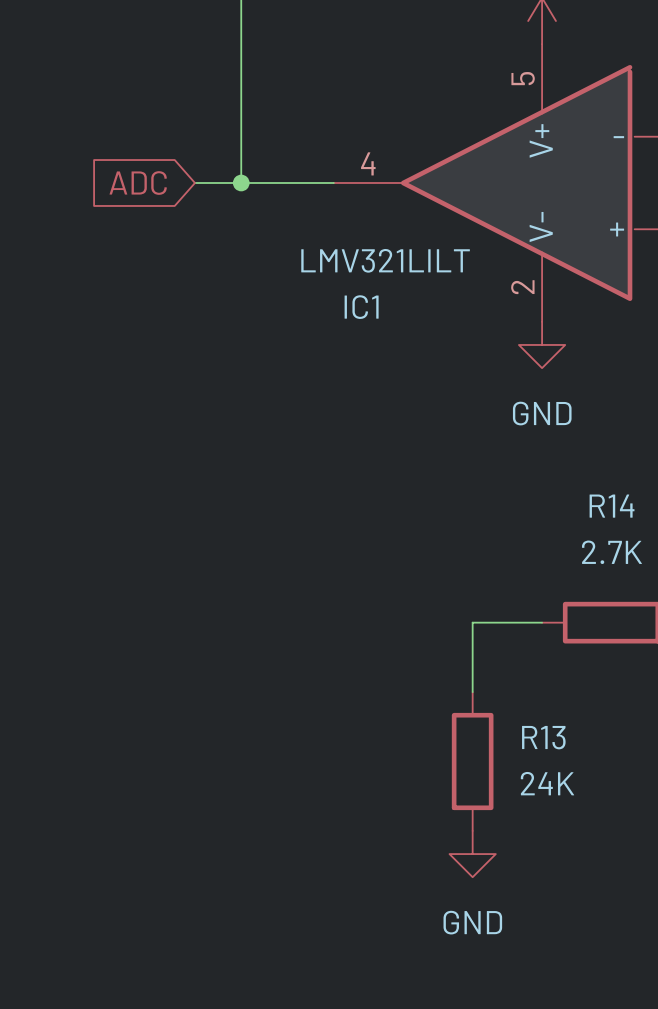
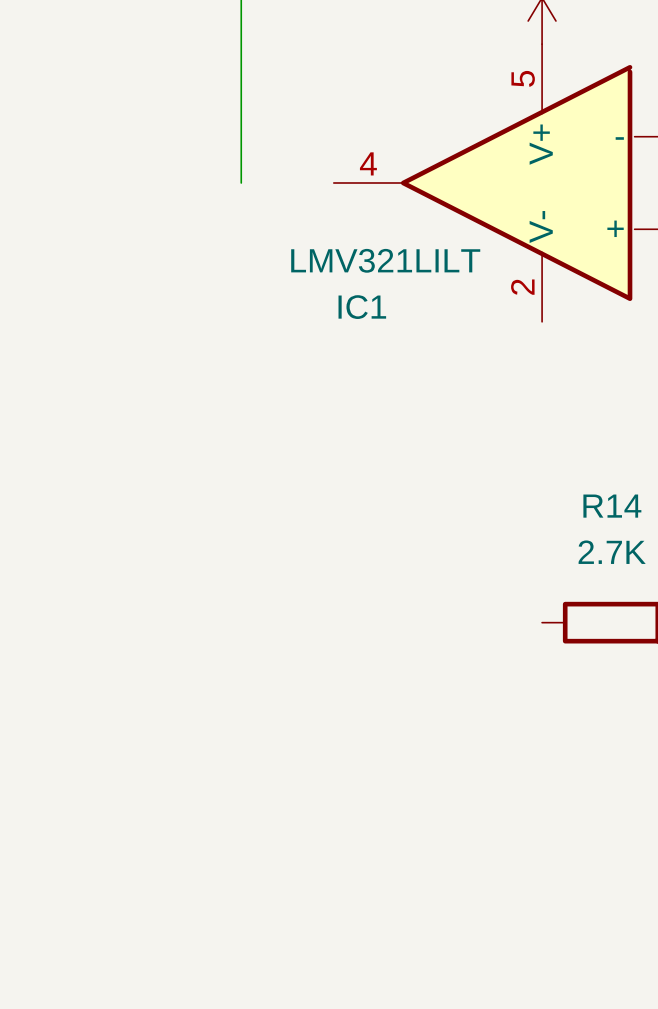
wire: (194, 182) (333, 182) -> none
junction: (241, 182) -> none
global label: ADC (138, 183) -> none
power symbol: GND (542, 344) -> none
wire: (542, 622) (472, 622) (472, 692) -> none
R13: 24K (472, 761) -> none
power symbol: GND (472, 854) -> none

